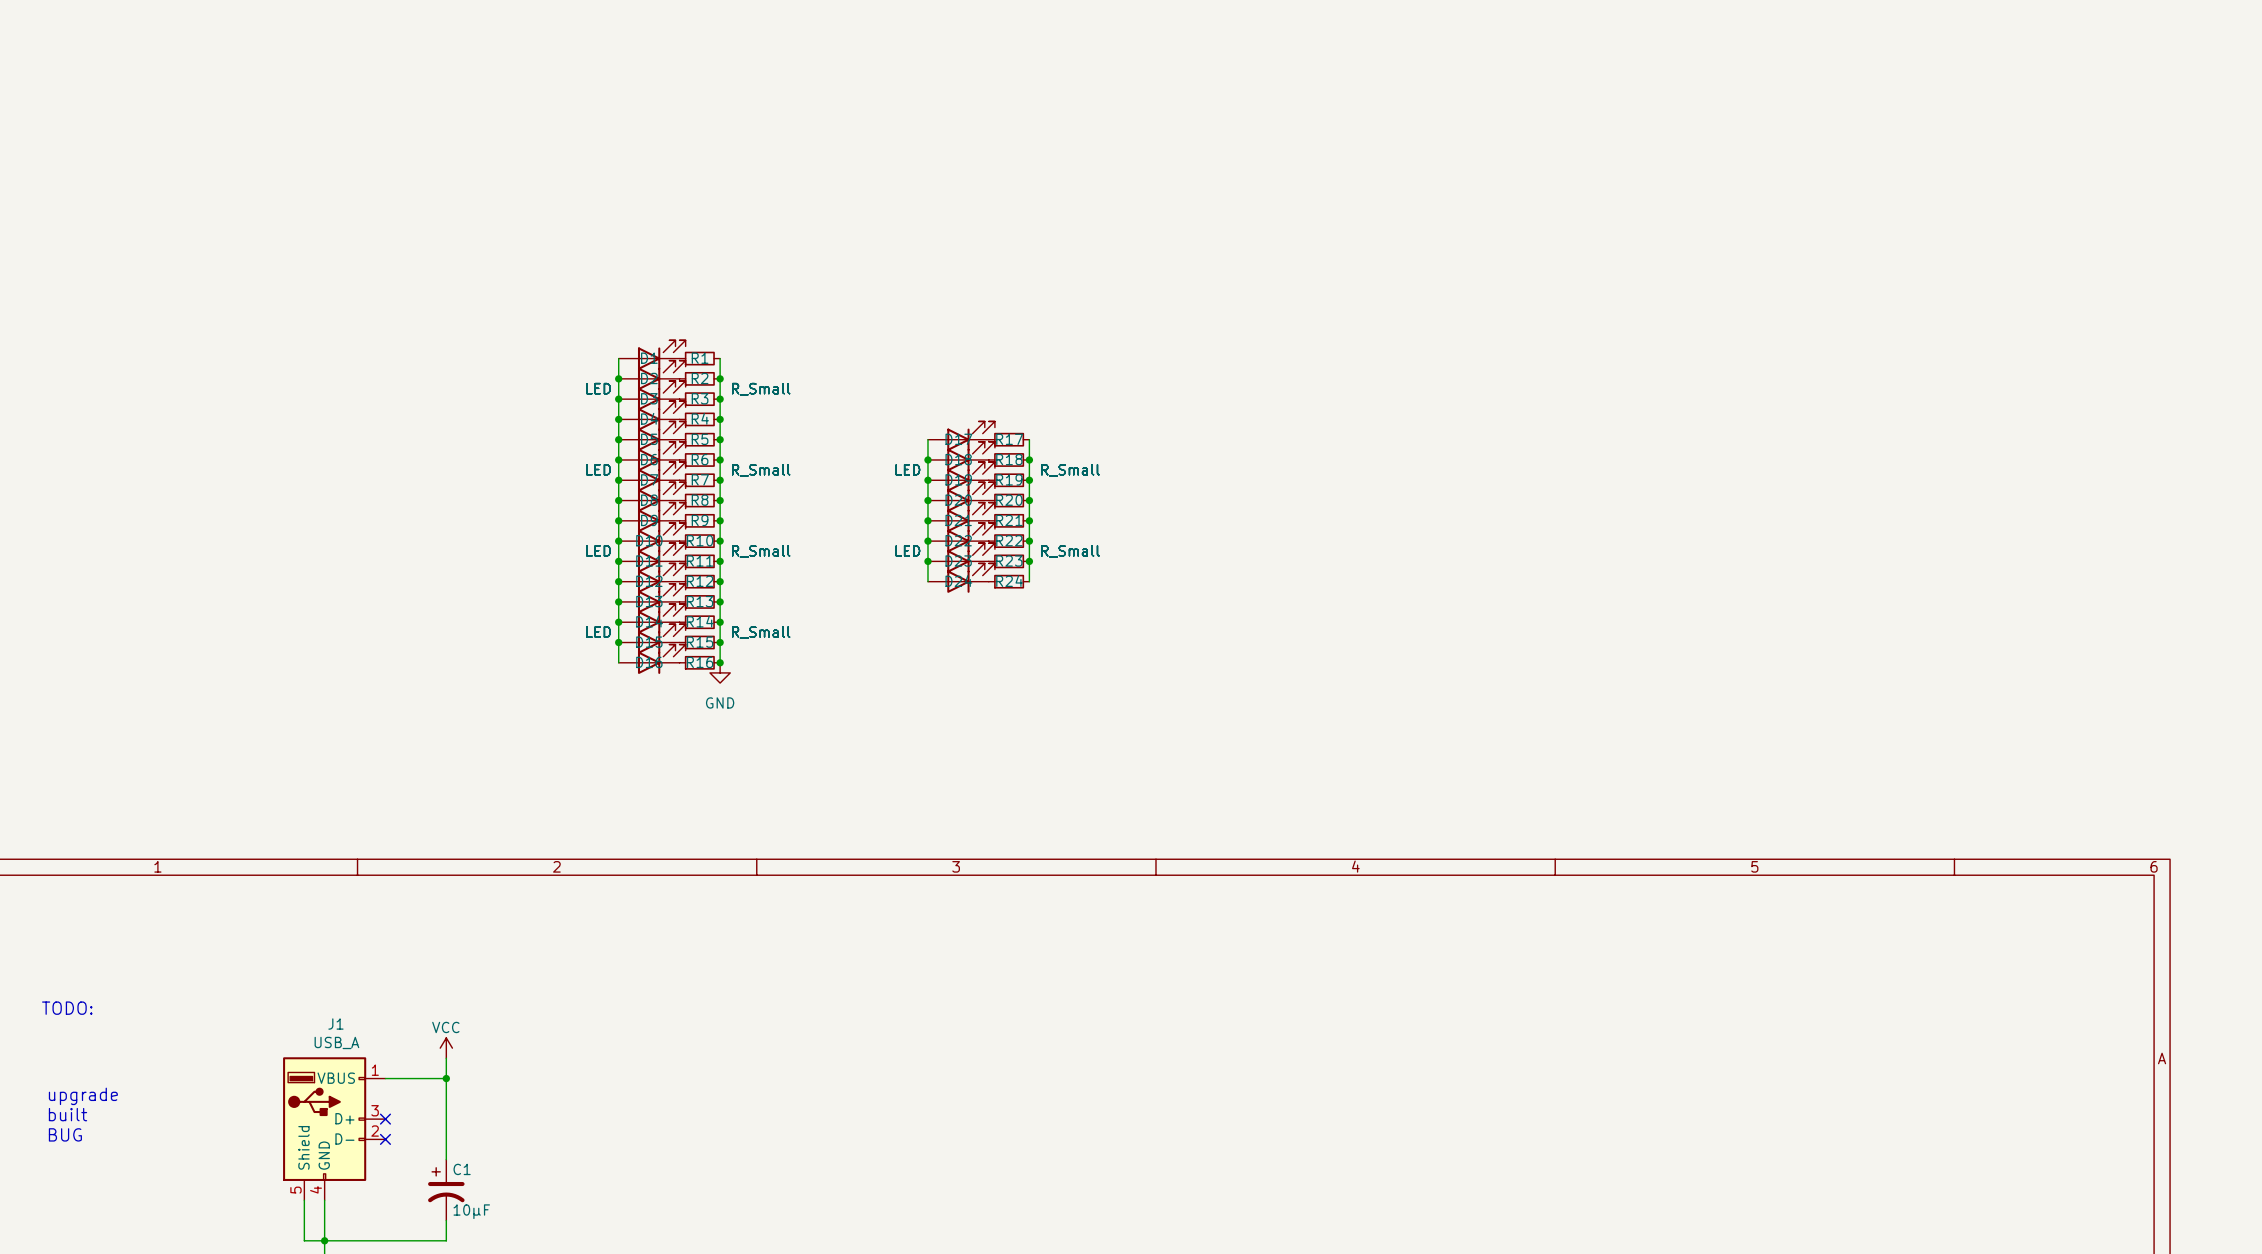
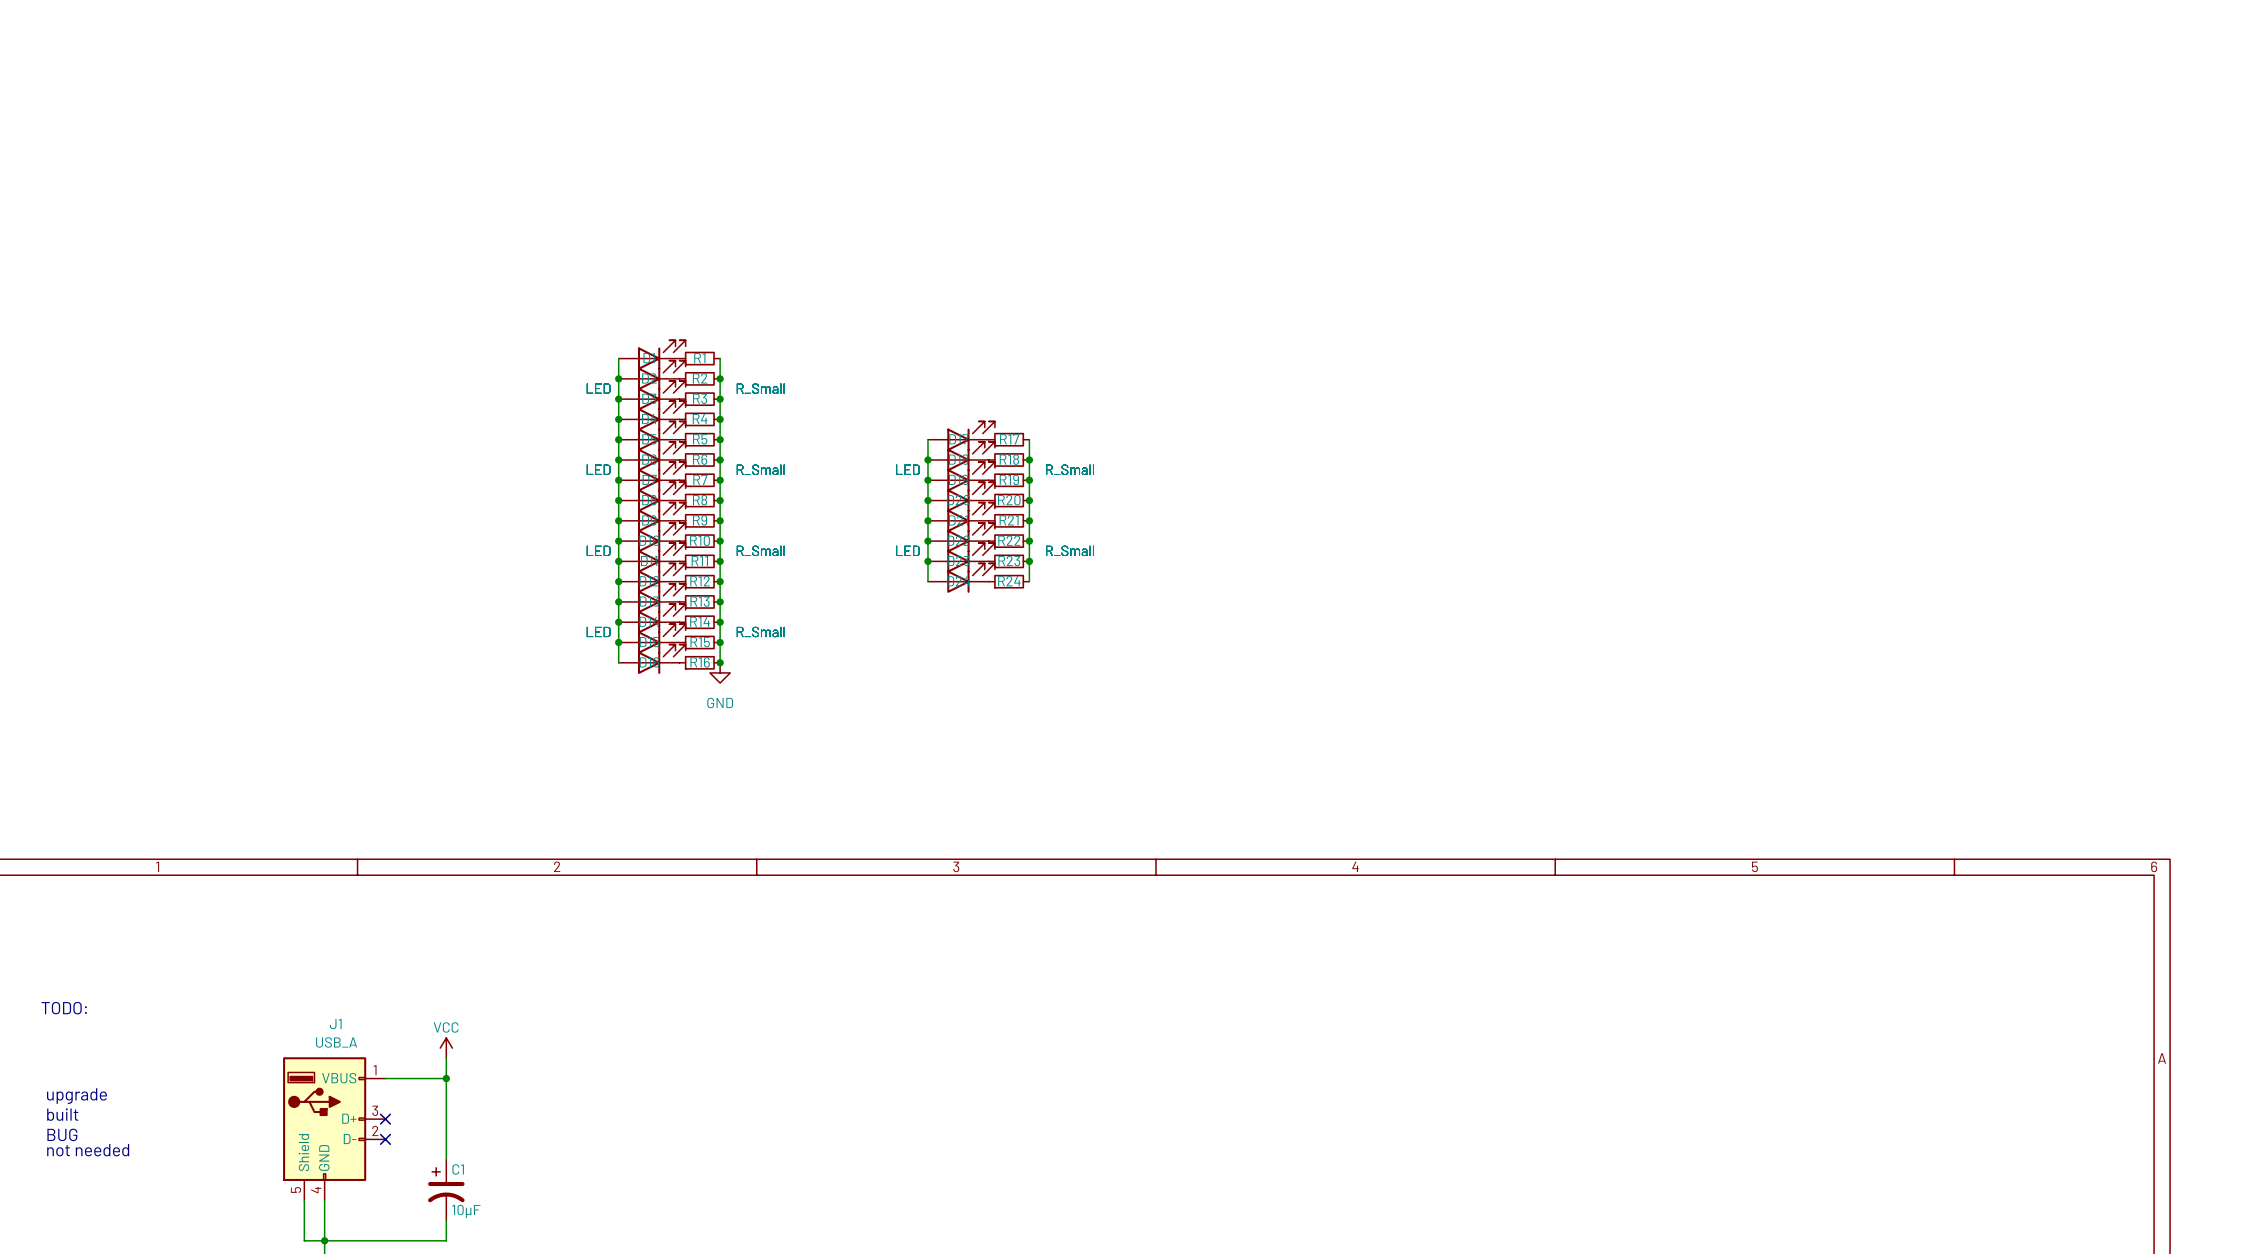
text: none -> not needed (88, 1150)

